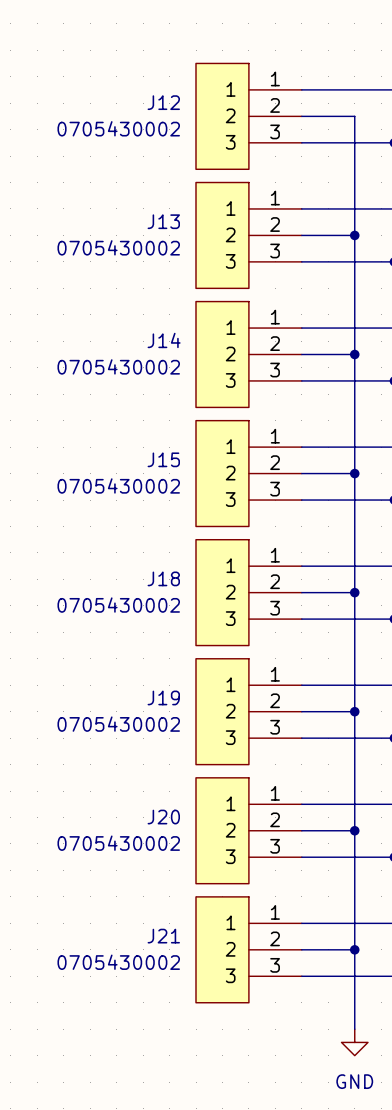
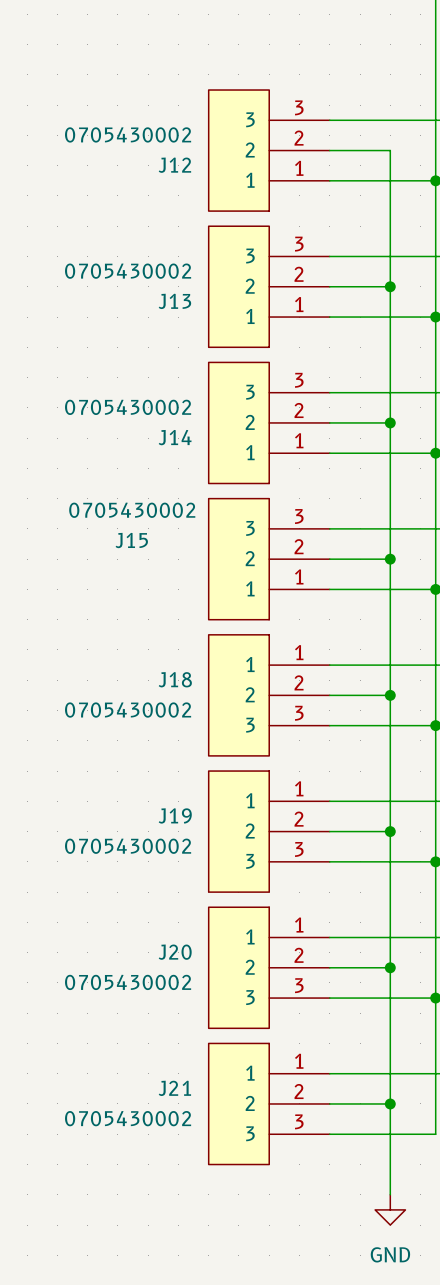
J12 flip: as is (222, 116) -> up-down (238, 150)
J13 flip: as is (222, 235) -> up-down (238, 286)
J14 flip: as is (222, 354) -> up-down (238, 422)
J15 name position: J15 (163, 459) -> J15 (131, 540)
J15 flip: as is (222, 473) -> up-down (238, 559)
J15 value position: 0705430002 (118, 485) -> 0705430002 (132, 510)

